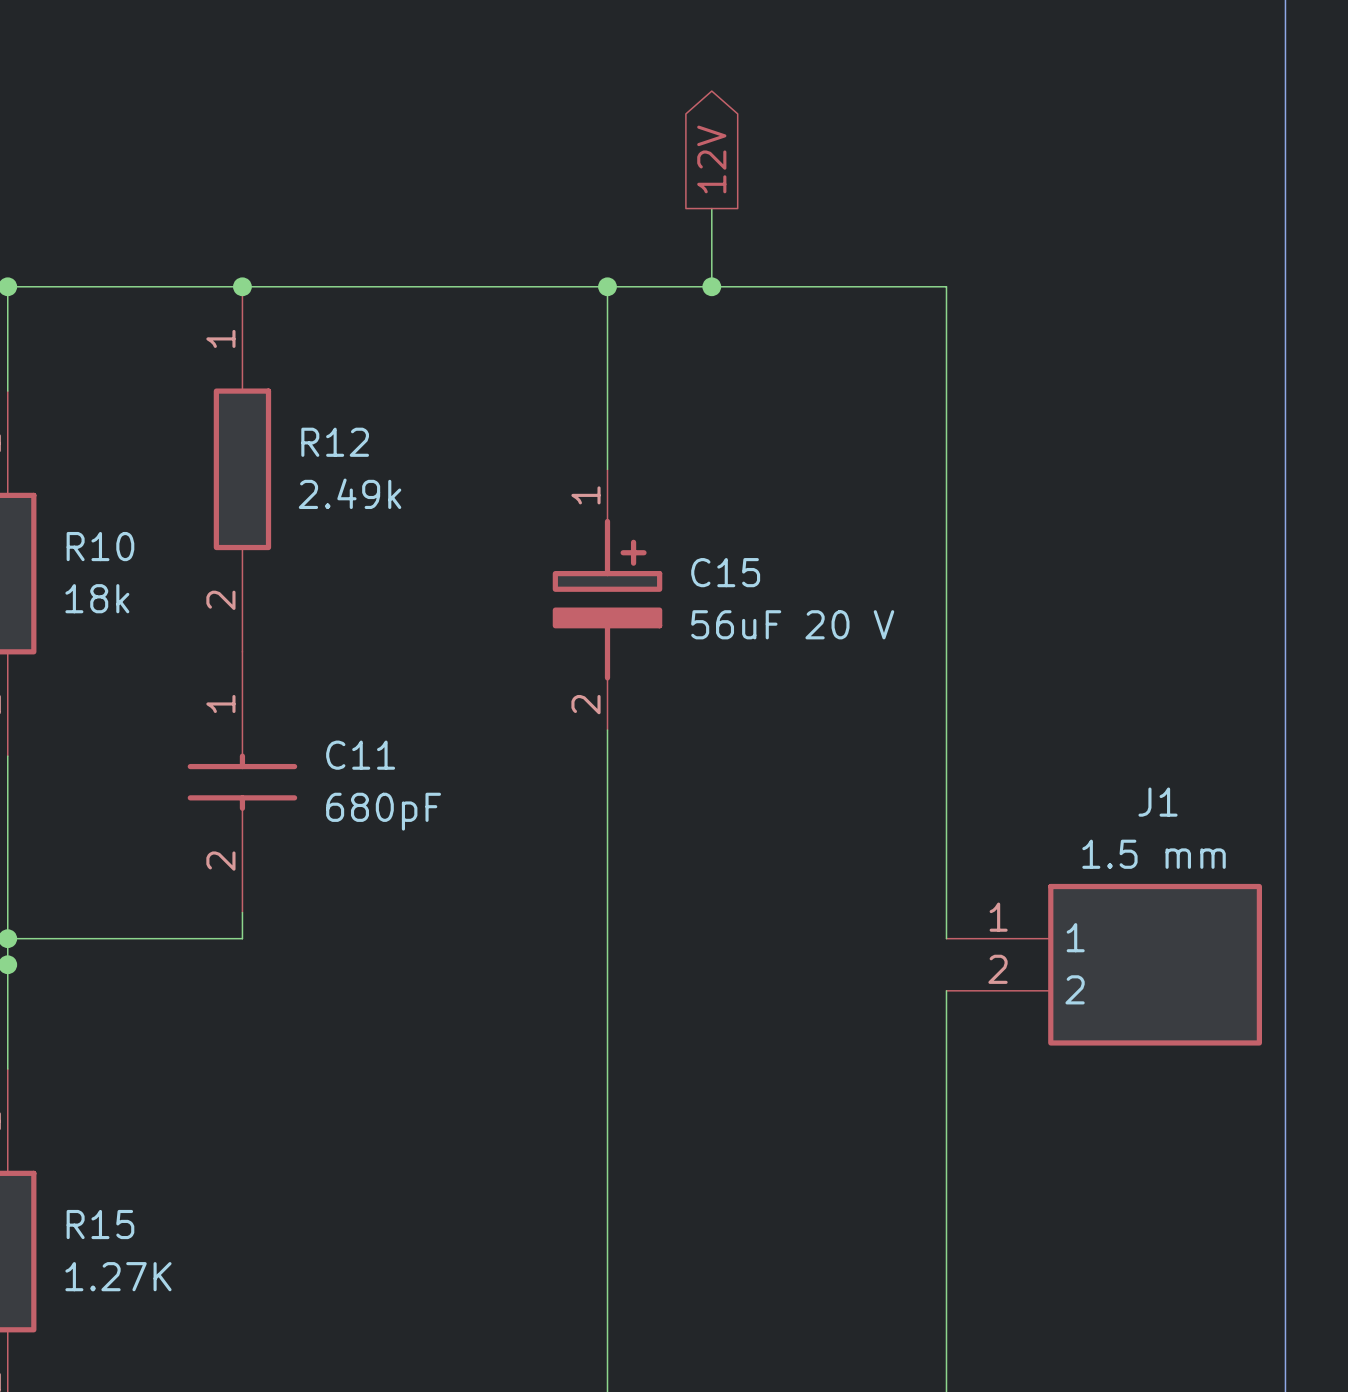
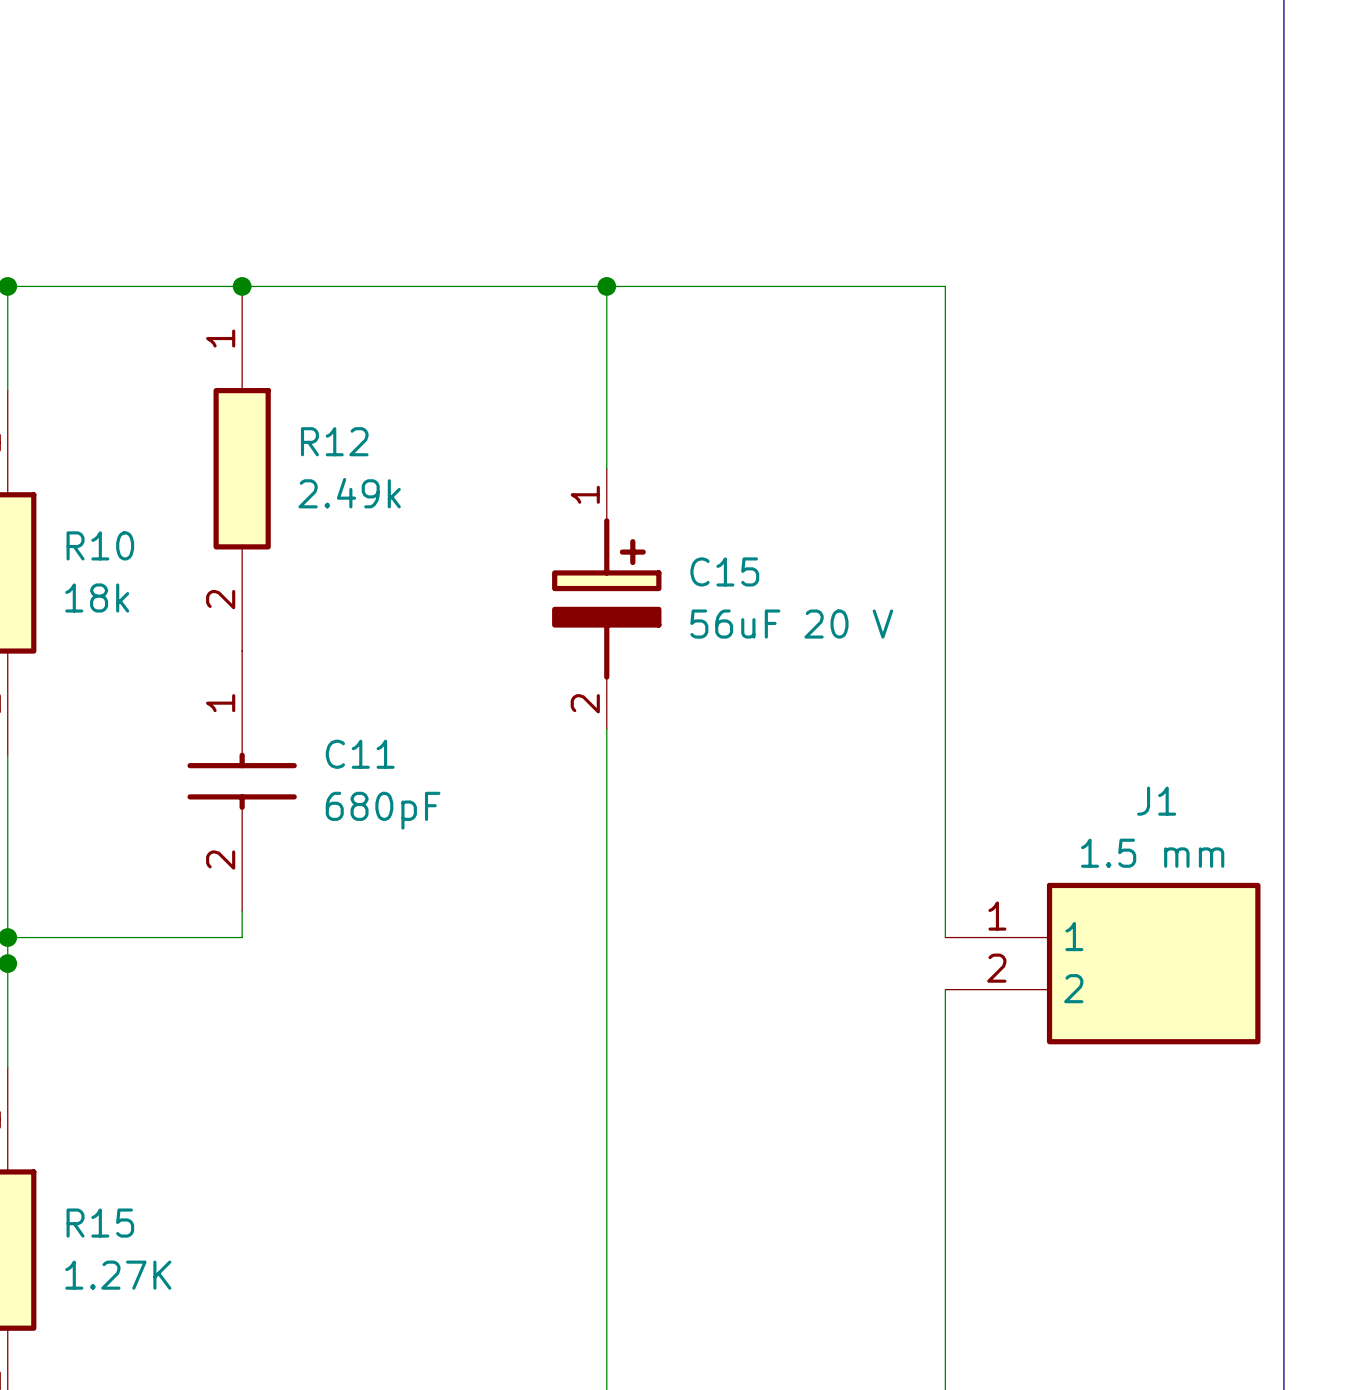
global label: 12V (711, 159) -> none
wire: (711, 208) (711, 286) -> none
junction: (711, 286) -> none

